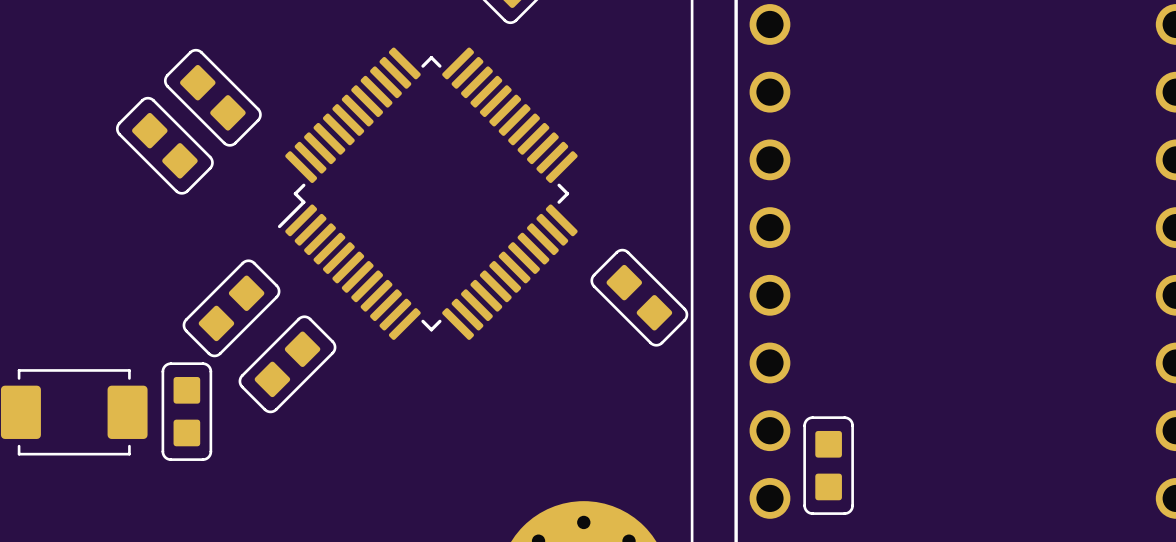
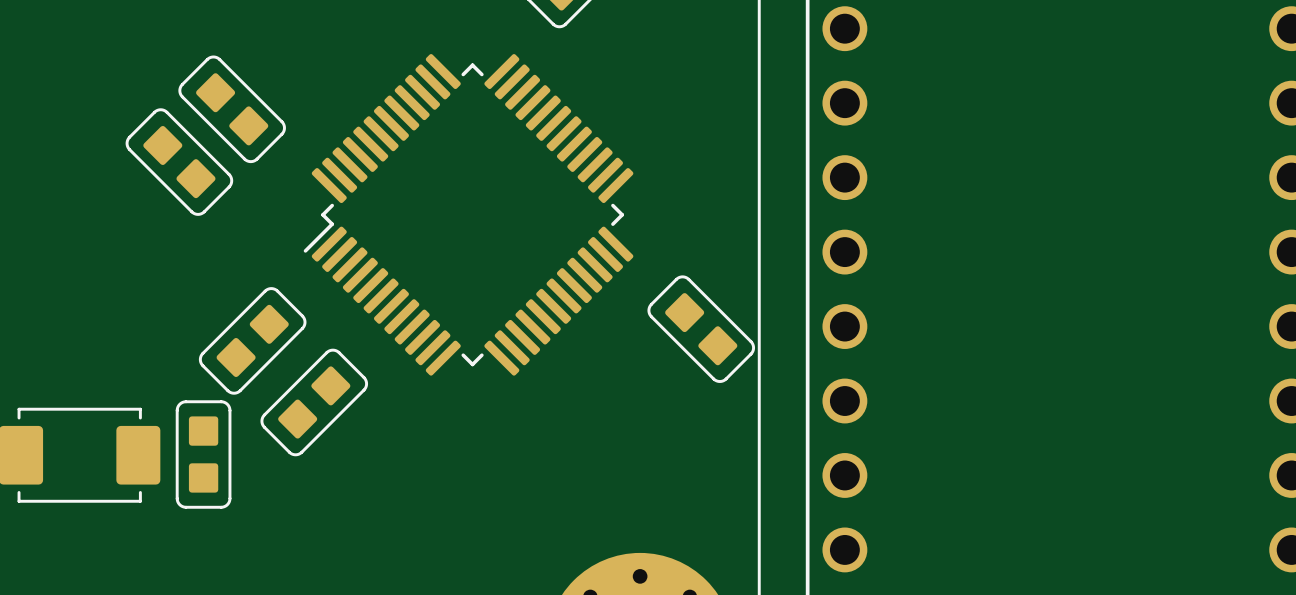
part: (828, 465) -> none

